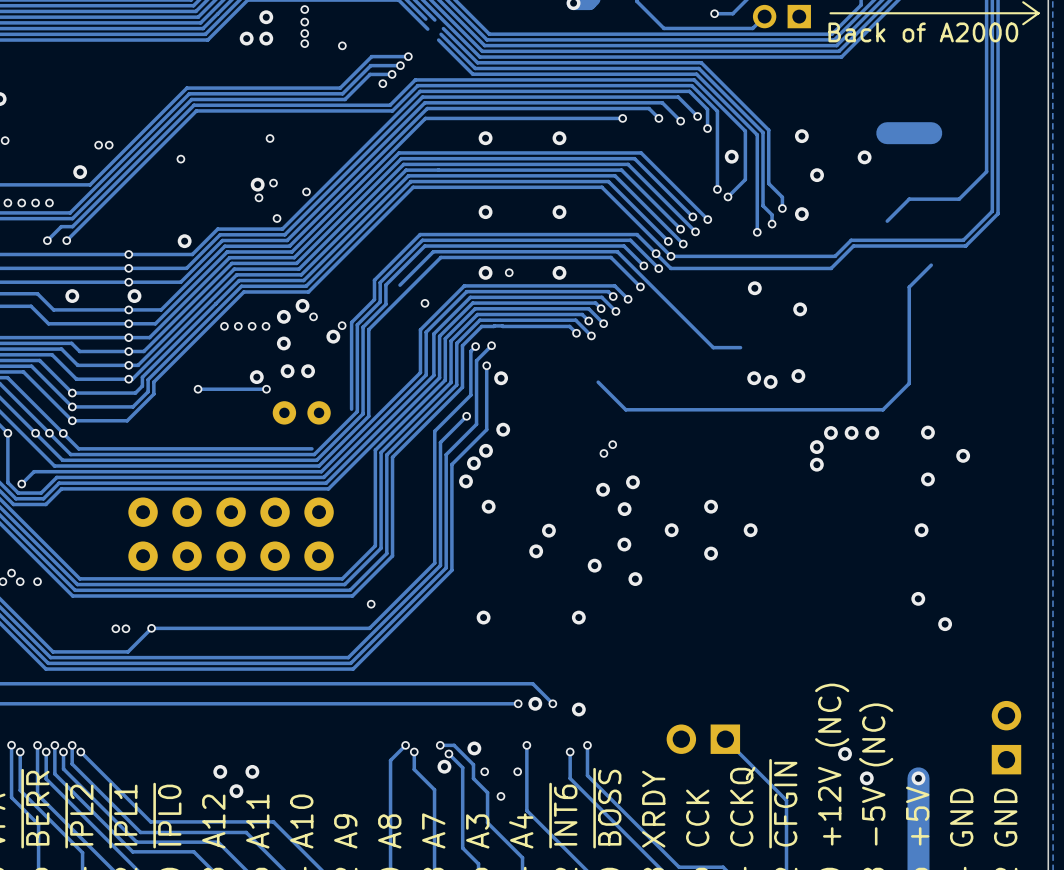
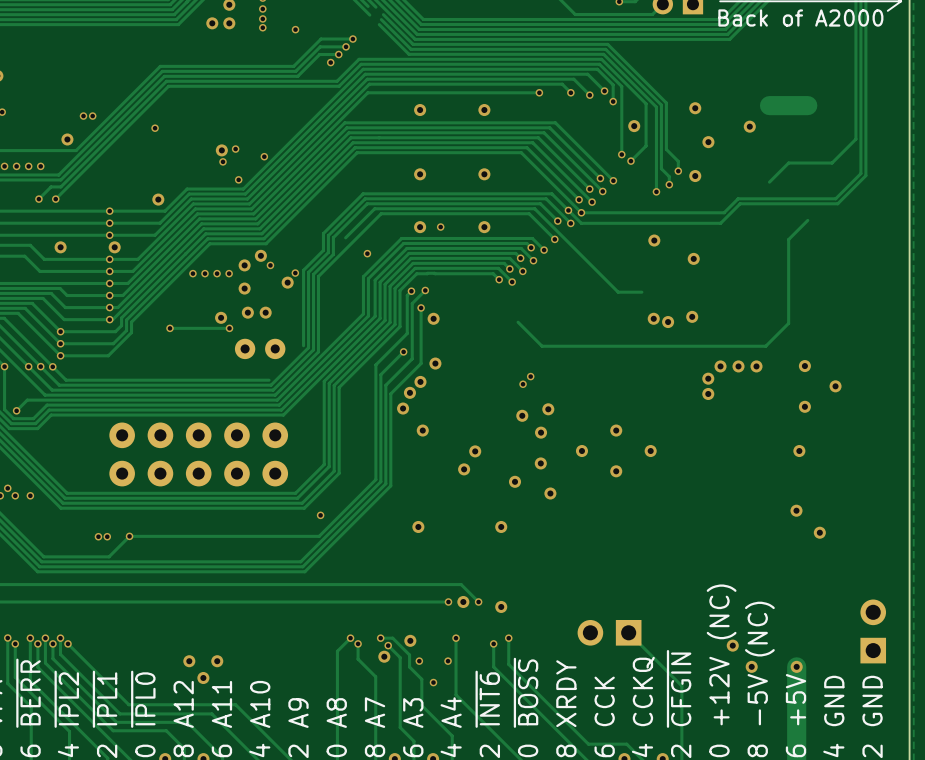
via: (270, 138) -> none

